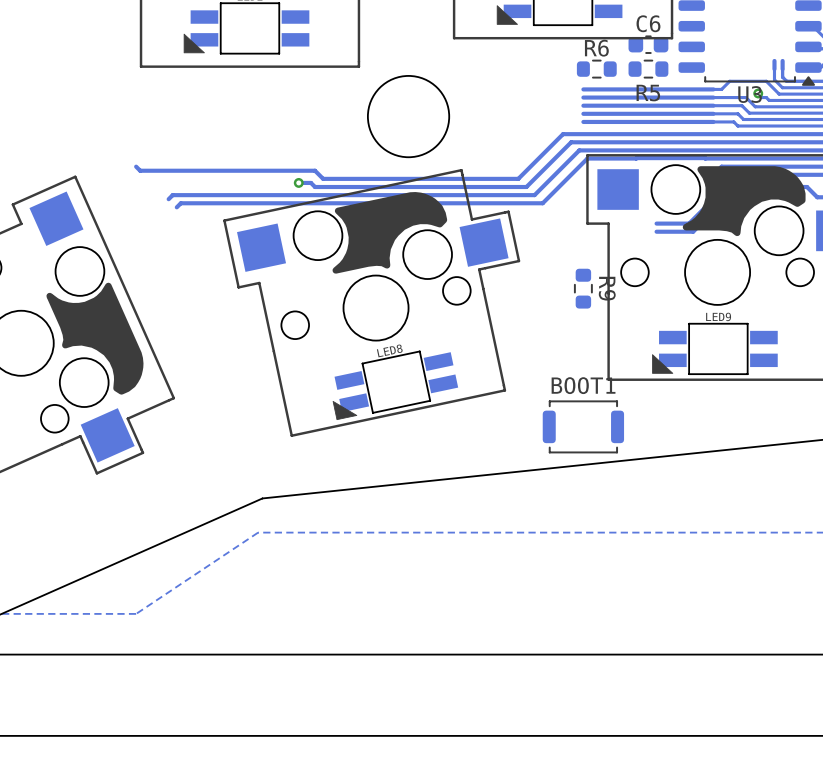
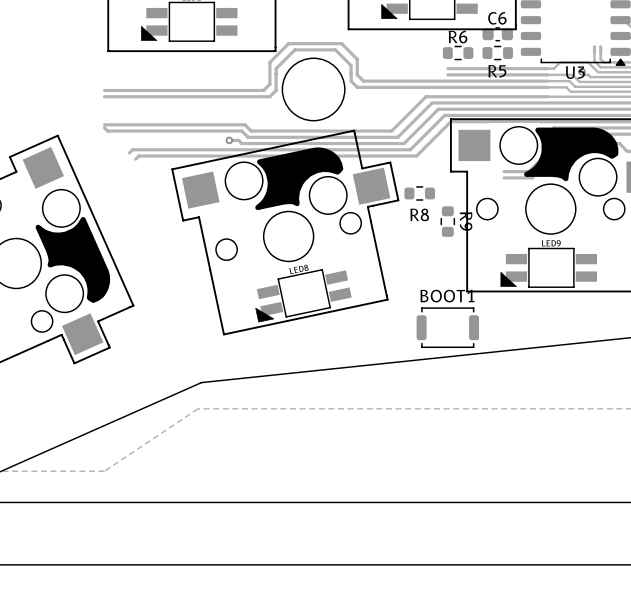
track: none -> (276, 73) (276, 90) (269, 96) (104, 96)
track: none -> (351, 73) (351, 81) (357, 87) (447, 87)
track: none -> (351, 73) (351, 65) (335, 49) (294, 49) (276, 68) (276, 73)
track: none -> (447, 81) (363, 81) (357, 74) (357, 59) (341, 43) (288, 43) (269, 62) (269, 84) (263, 90) (104, 90)
track: (583, 121) (733, 121) (737, 126) -> (104, 124) (244, 124) (251, 131) (391, 131) (425, 96) (566, 96)
R8: none -> (419, 193)

